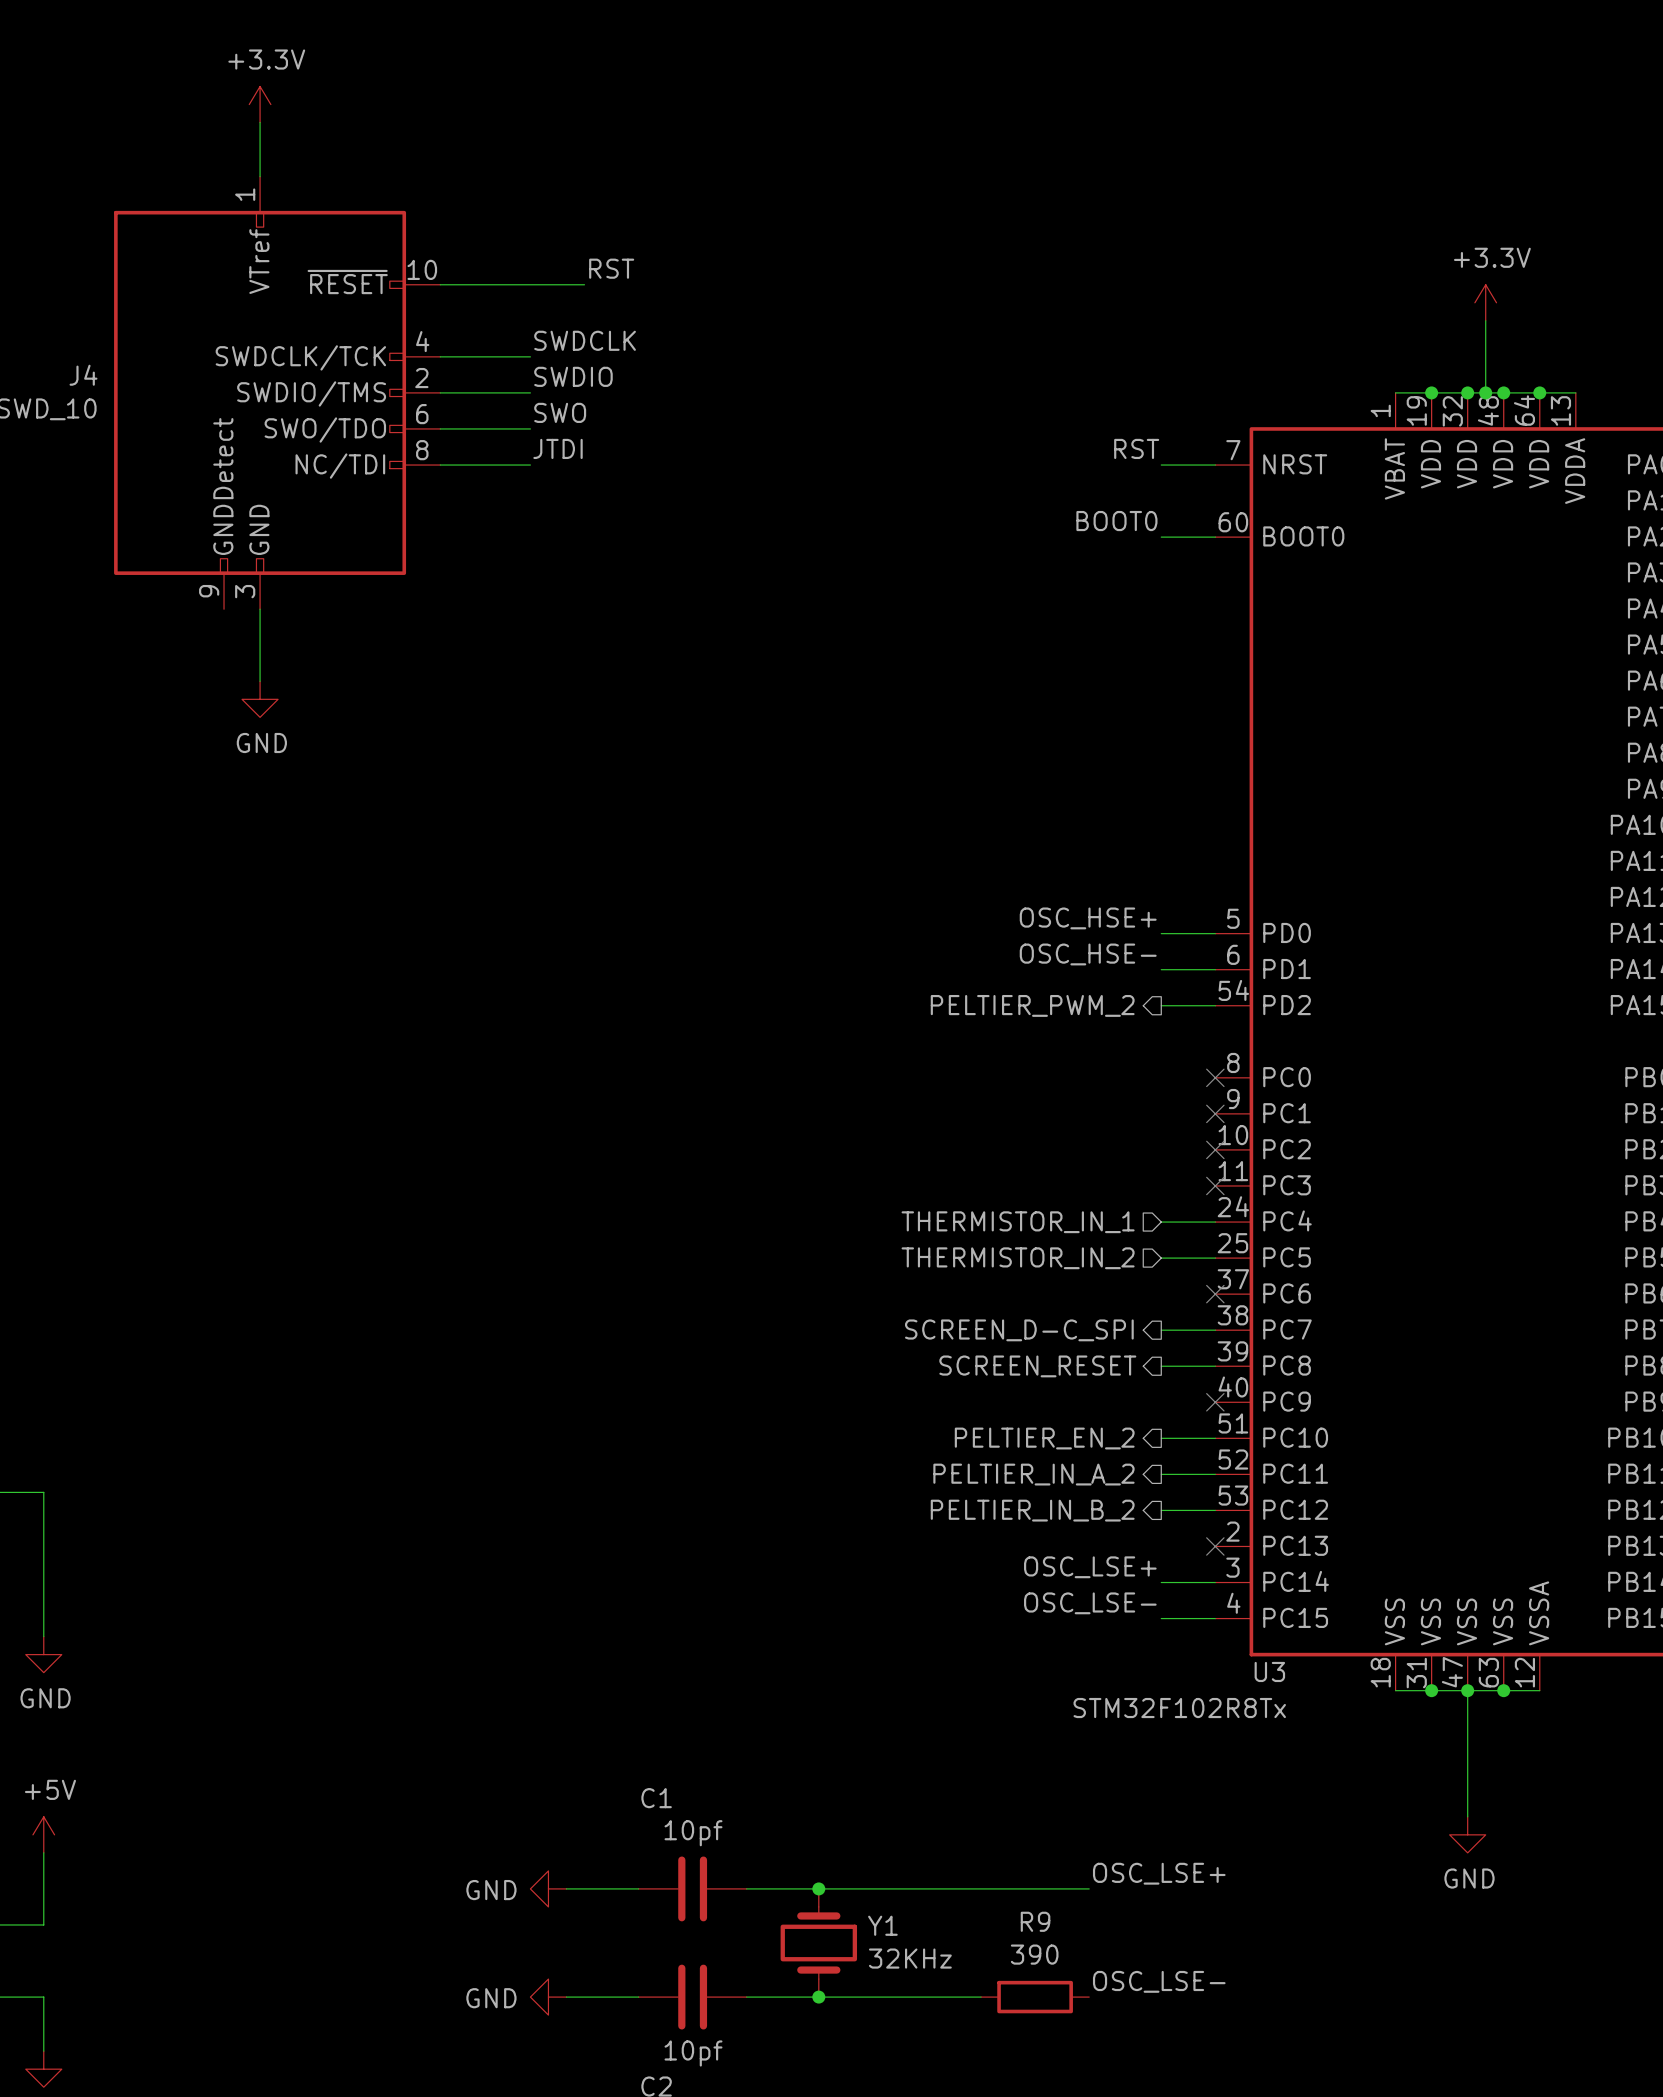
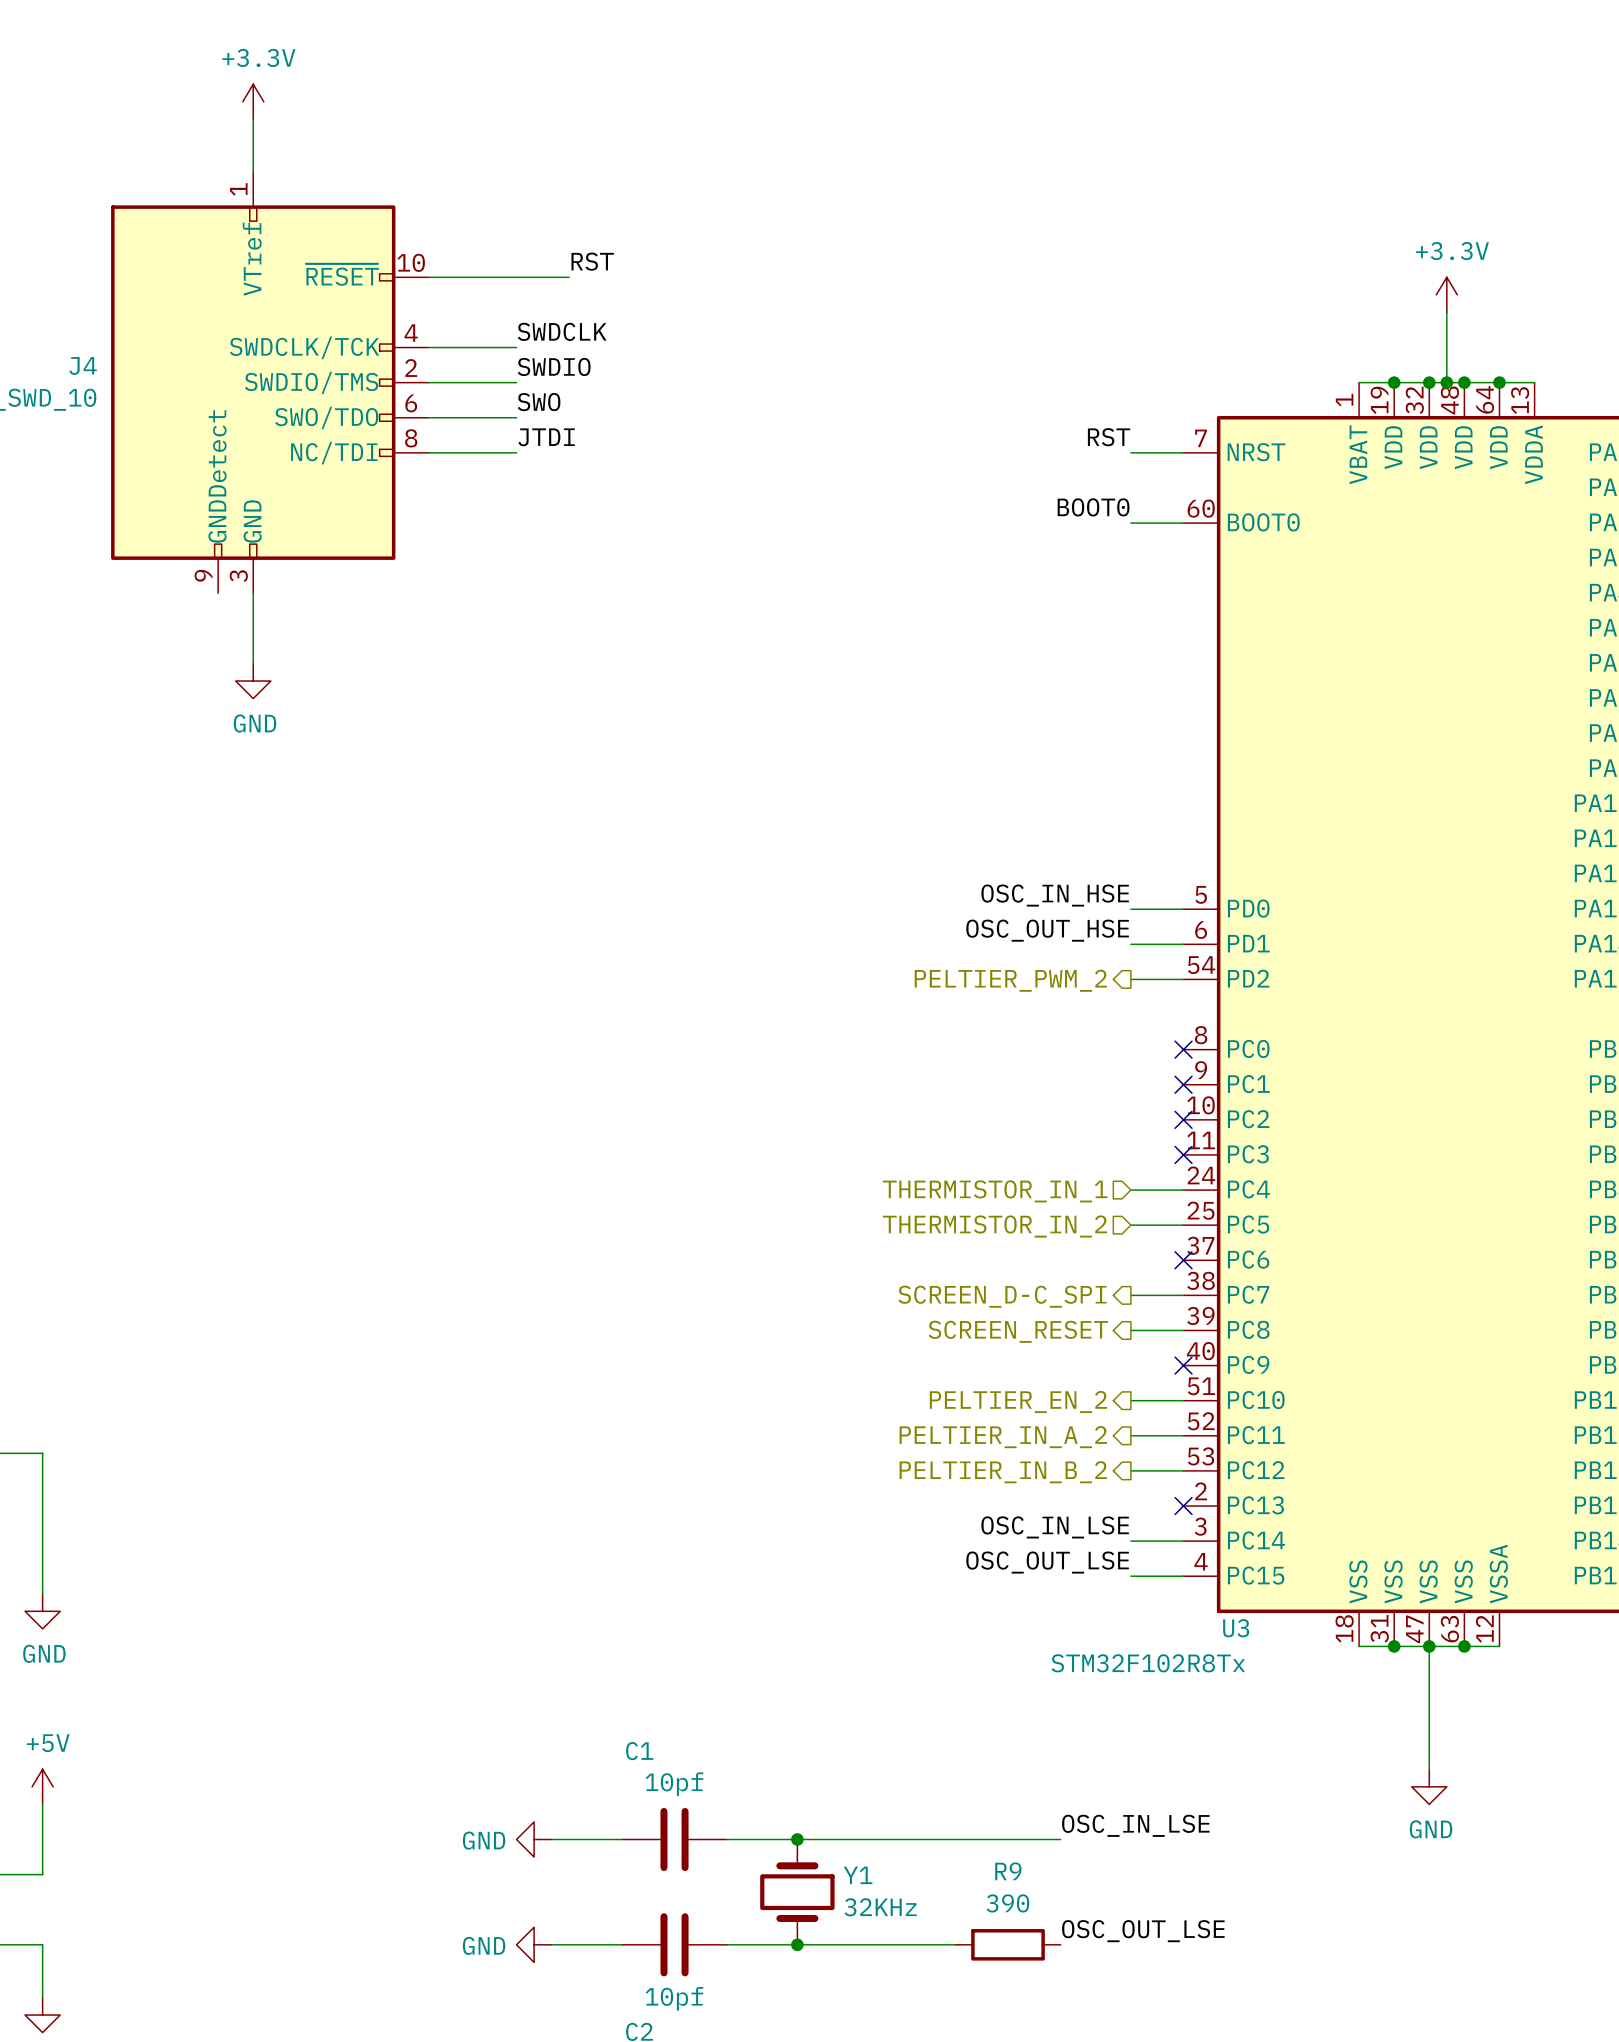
label: OSC_HSE+ (1088, 918) -> OSC_IN_HSE (1055, 895)
label: OSC_HSE- (1088, 954) -> OSC_OUT_HSE (1047, 930)
label: OSC_LSE+ (1090, 1567) -> OSC_IN_LSE (1055, 1527)
label: OSC_LSE- (1090, 1603) -> OSC_OUT_LSE (1047, 1562)
label: OSC_LSE+ (1159, 1873) -> OSC_IN_LSE (1135, 1825)
label: OSC_LSE- (1159, 1981) -> OSC_OUT_LSE (1143, 1931)

